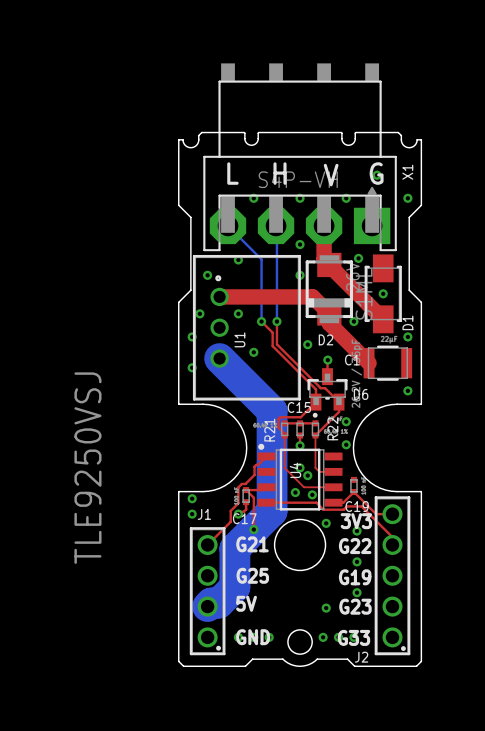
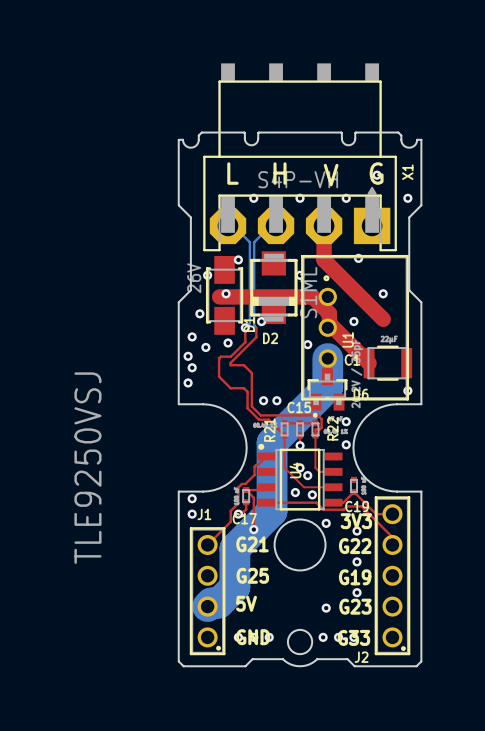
bottom track: (228, 225) (261, 259) (261, 321) -> (228, 225) (233, 225) (249, 242) (249, 323) (245, 327)
bottom track: (276, 225) (276, 321) -> (276, 225) (270, 225) (254, 242) (254, 325) (256, 327)
via: (300, 244) -> none
D2 position: (329, 289) -> (273, 287)
via: none -> (226, 293)
D1 position: (383, 293) -> (224, 295)
via: (238, 313) -> none
top track: (261, 321) (272, 332) (272, 346) (315, 389) (315, 402) (300, 417) (280, 417) (278, 419) (278, 427) (284, 435) -> (245, 327) (245, 342) (230, 356) (220, 356) (219, 358) (219, 376) (230, 388) (243, 388) (247, 391) (247, 408) (258, 419) (268, 419) (284, 435)
top track: (276, 321) (276, 344) (320, 388) (325, 388) (339, 402) (339, 411) (315, 435) -> (256, 327) (256, 337) (230, 362) (230, 365) (243, 365) (251, 373) (251, 406) (260, 415) (317, 415) (321, 419) (321, 427) (315, 429) (315, 435)
via: (276, 321) -> none
via: none -> (245, 327)
U1 position: (246, 327) -> (355, 327)
via: (407, 336) -> none
via: none -> (228, 343)
via: none -> (205, 347)
via: (253, 352) -> none
via: none -> (188, 356)
bottom track: (219, 358) (272, 411) (272, 442) -> (327, 358) (327, 387) (272, 442)
via: (327, 360) -> none
via: none -> (188, 382)
via: none -> (263, 400)
via: none -> (276, 400)

